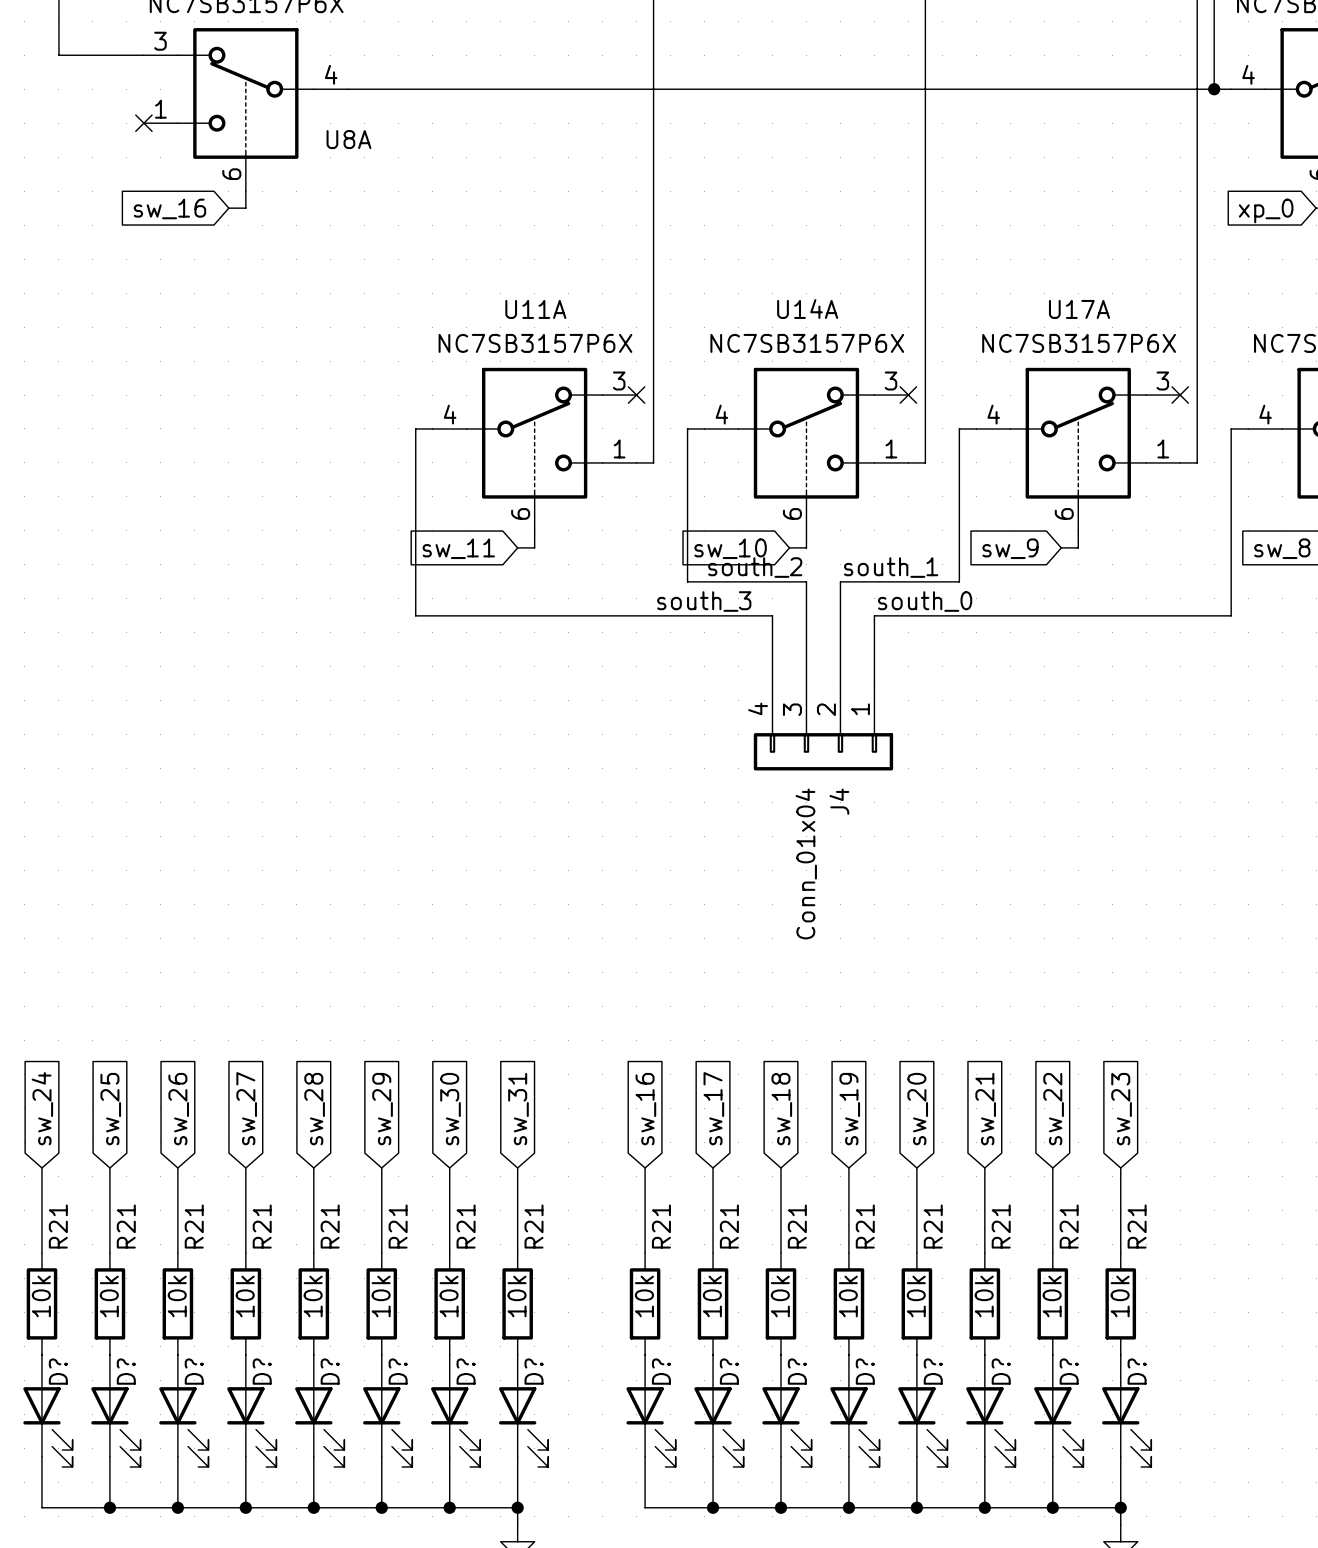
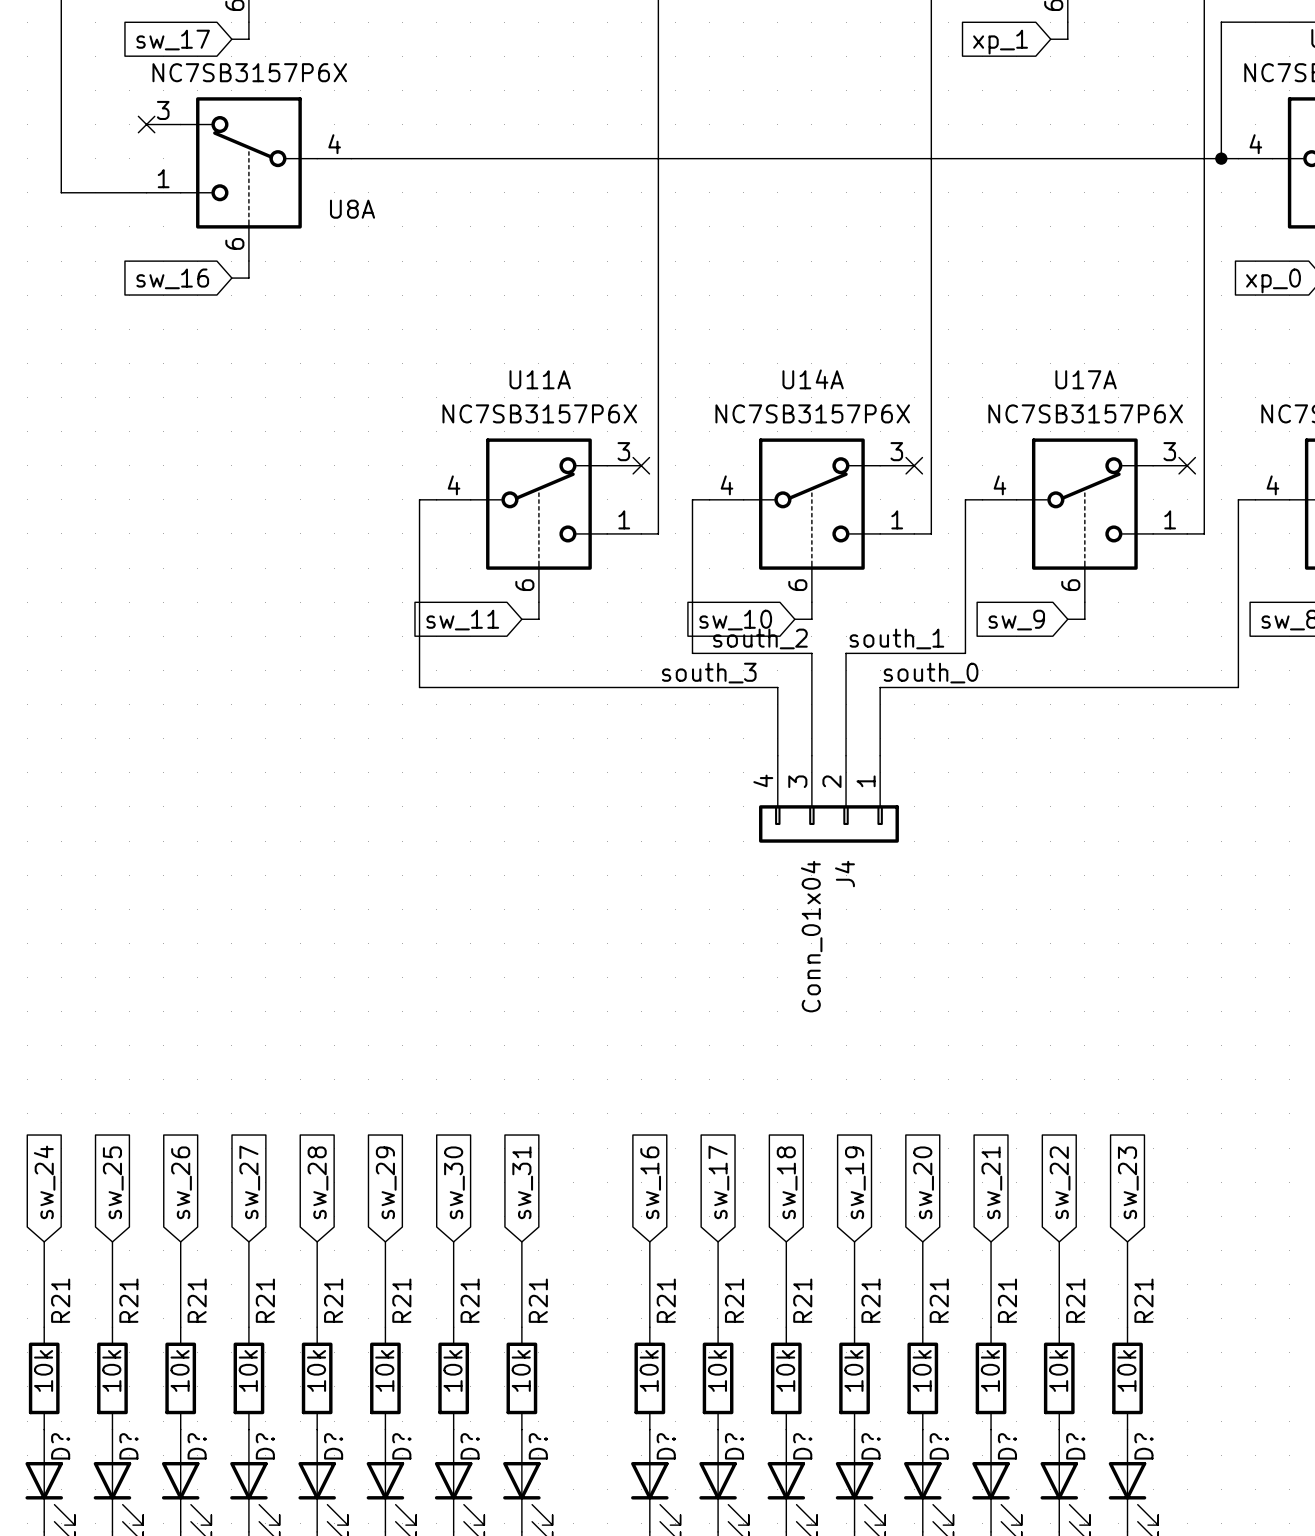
wire: (58, 55) (143, 55) -> (61, 124) (61, 192) (146, 192)
no-connect mark position: (143, 123) -> (146, 124)

